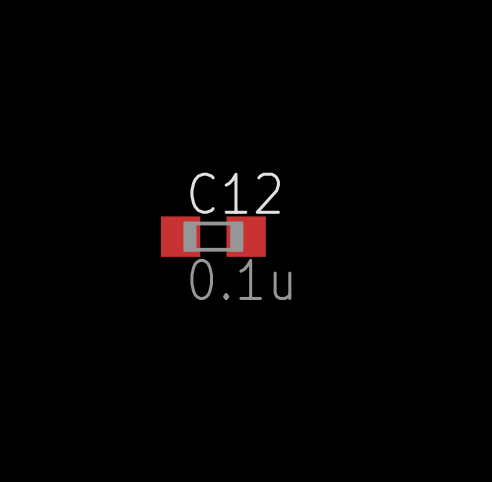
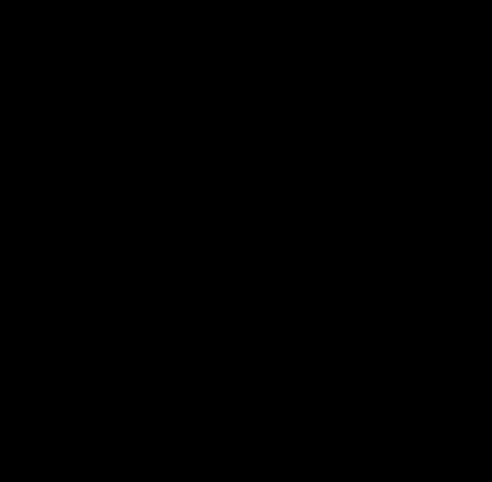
C12: 0.1u (213, 236) -> none

